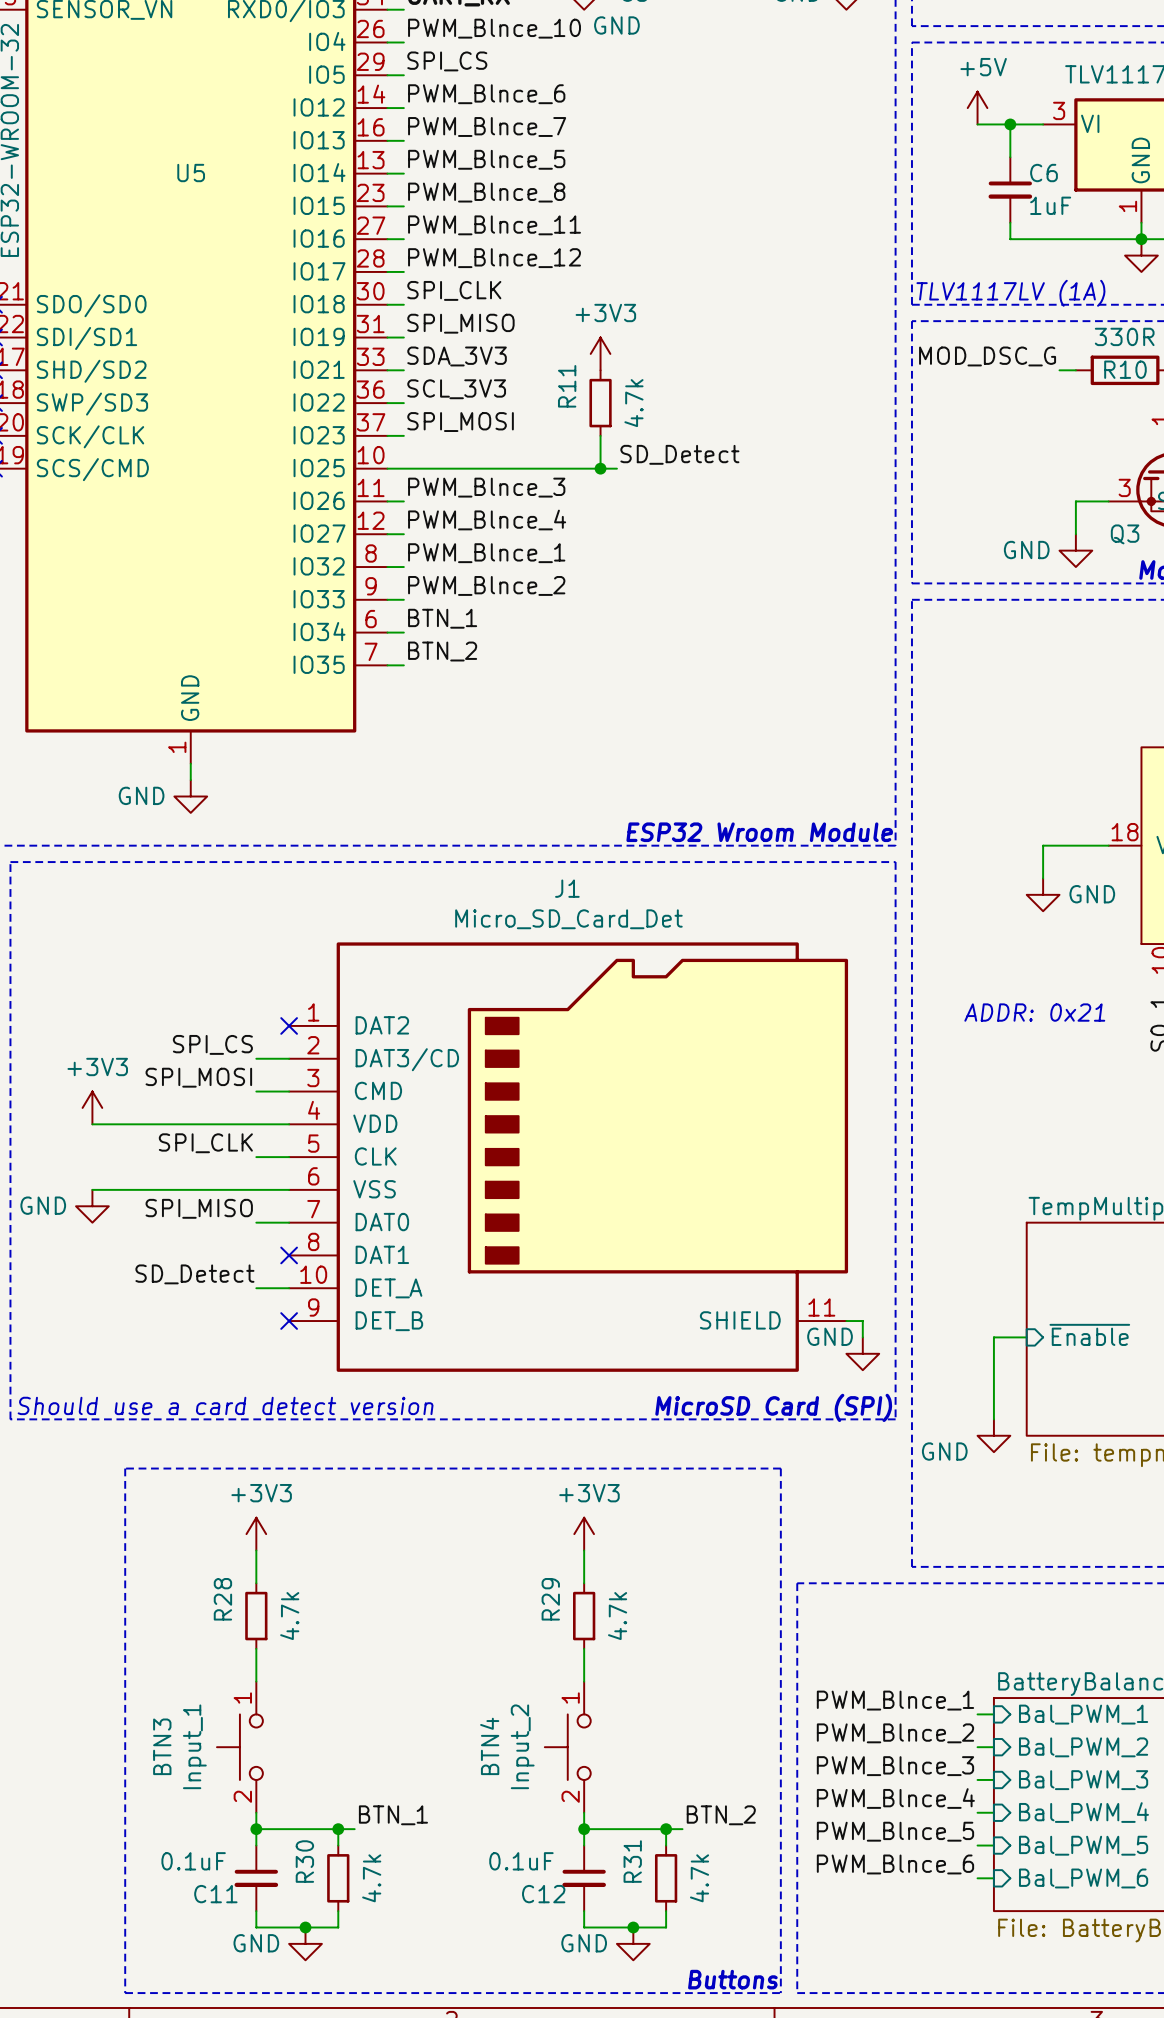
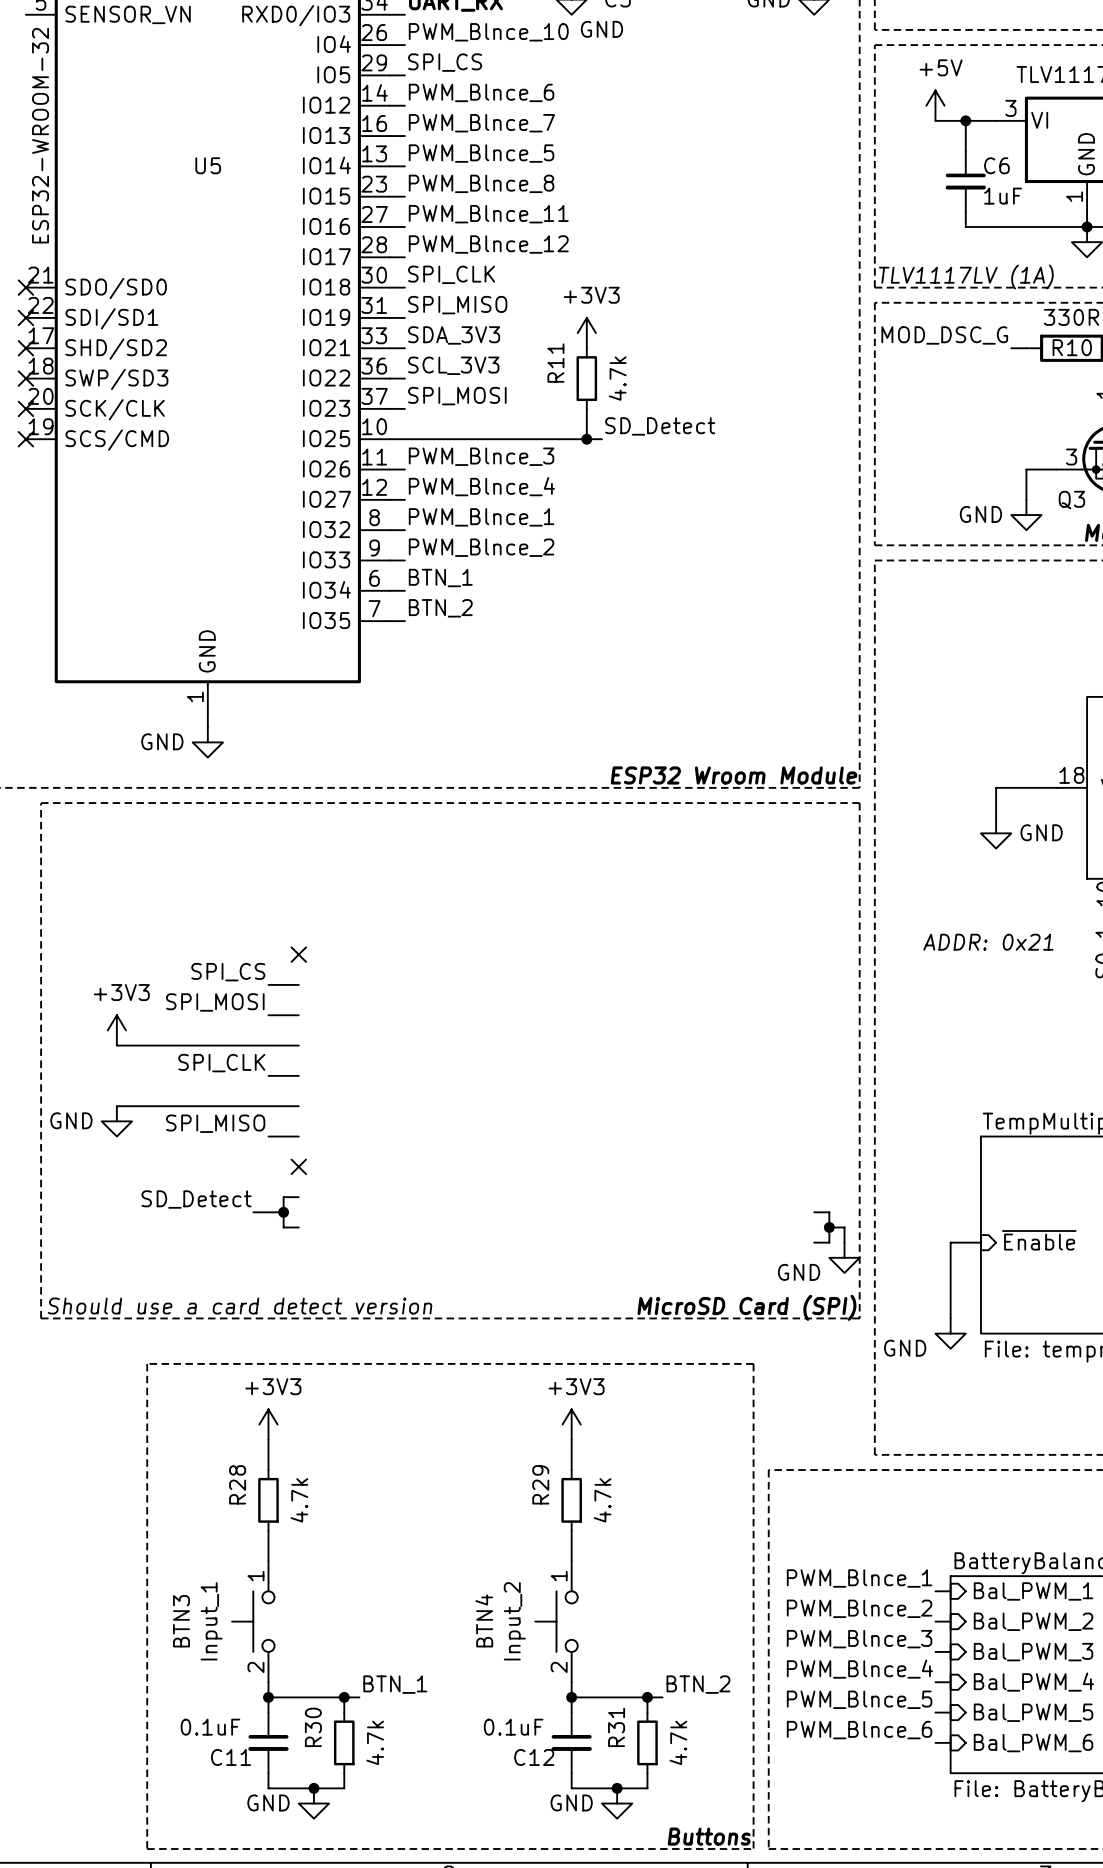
J1: Micro_SD_Card_Det (568, 1157) -> none
label position: SD_Detect (194, 1274) -> SD_Detect (196, 1199)
wire: (256, 1288) (272, 1288) -> (298, 1227) (283, 1227) (283, 1197)
wire: none -> (253, 1212) (283, 1212)
junction: none -> (283, 1212)
wire: none -> (814, 1212) (829, 1212) (829, 1227) (844, 1227) (844, 1242)
no-connect mark: (289, 1321) -> none
wire: (846, 1321) (862, 1321) -> (814, 1242) (829, 1242)
junction: none -> (829, 1227)
power symbol text position: GND (830, 1336) -> GND (799, 1272)
power symbol position: GND (862, 1353) -> GND (844, 1257)

